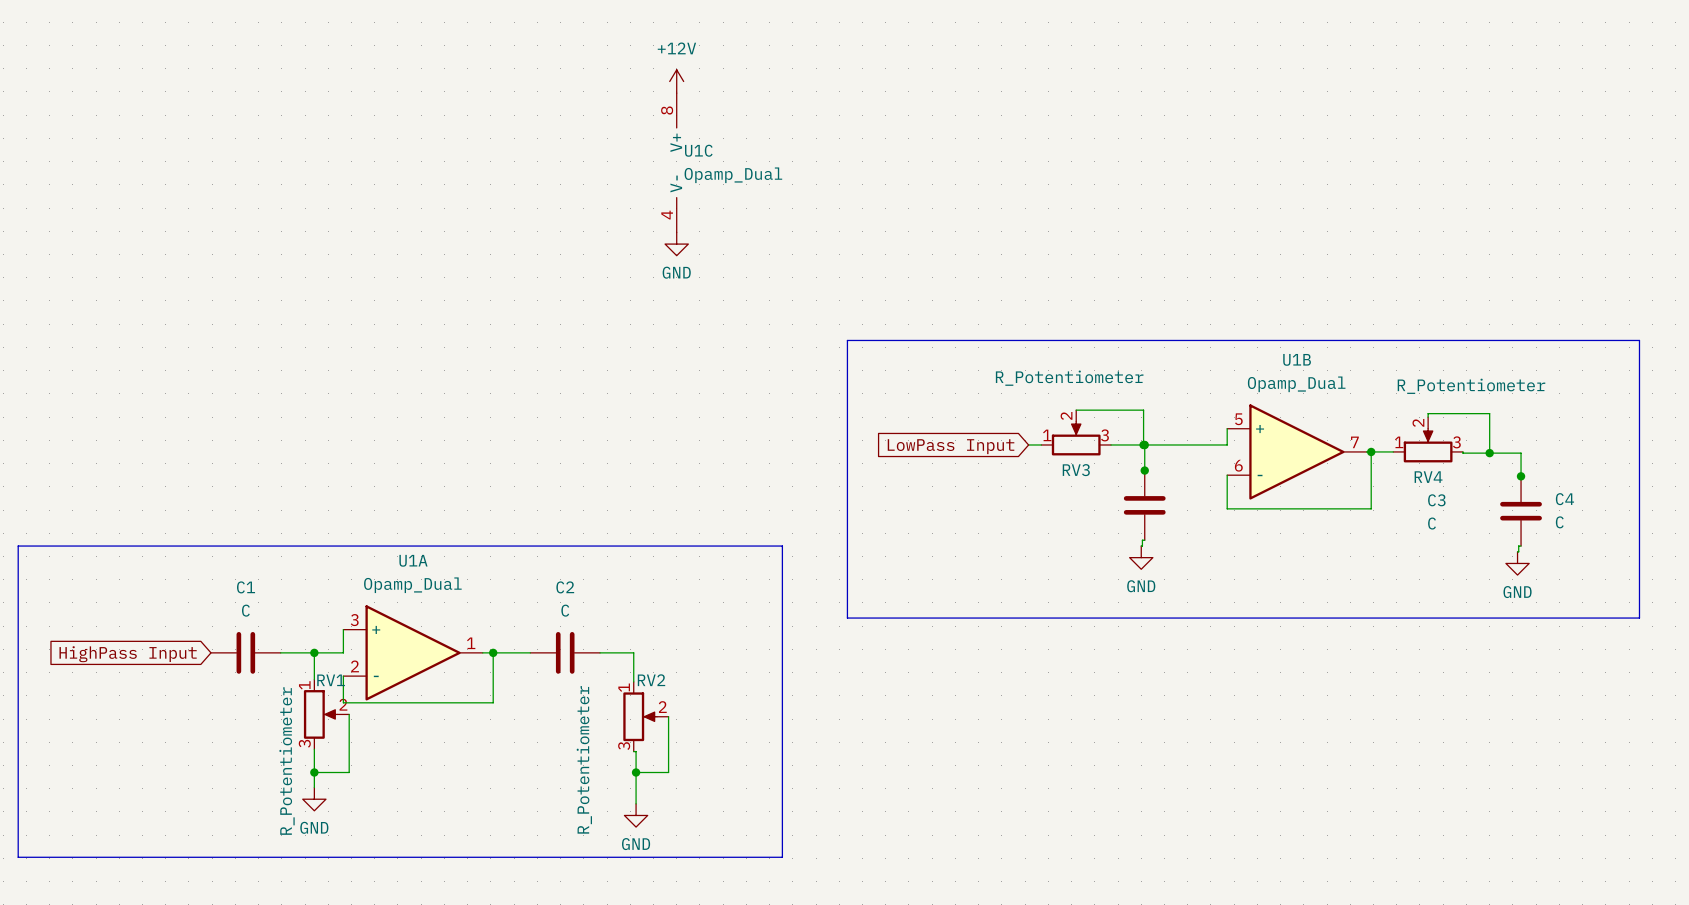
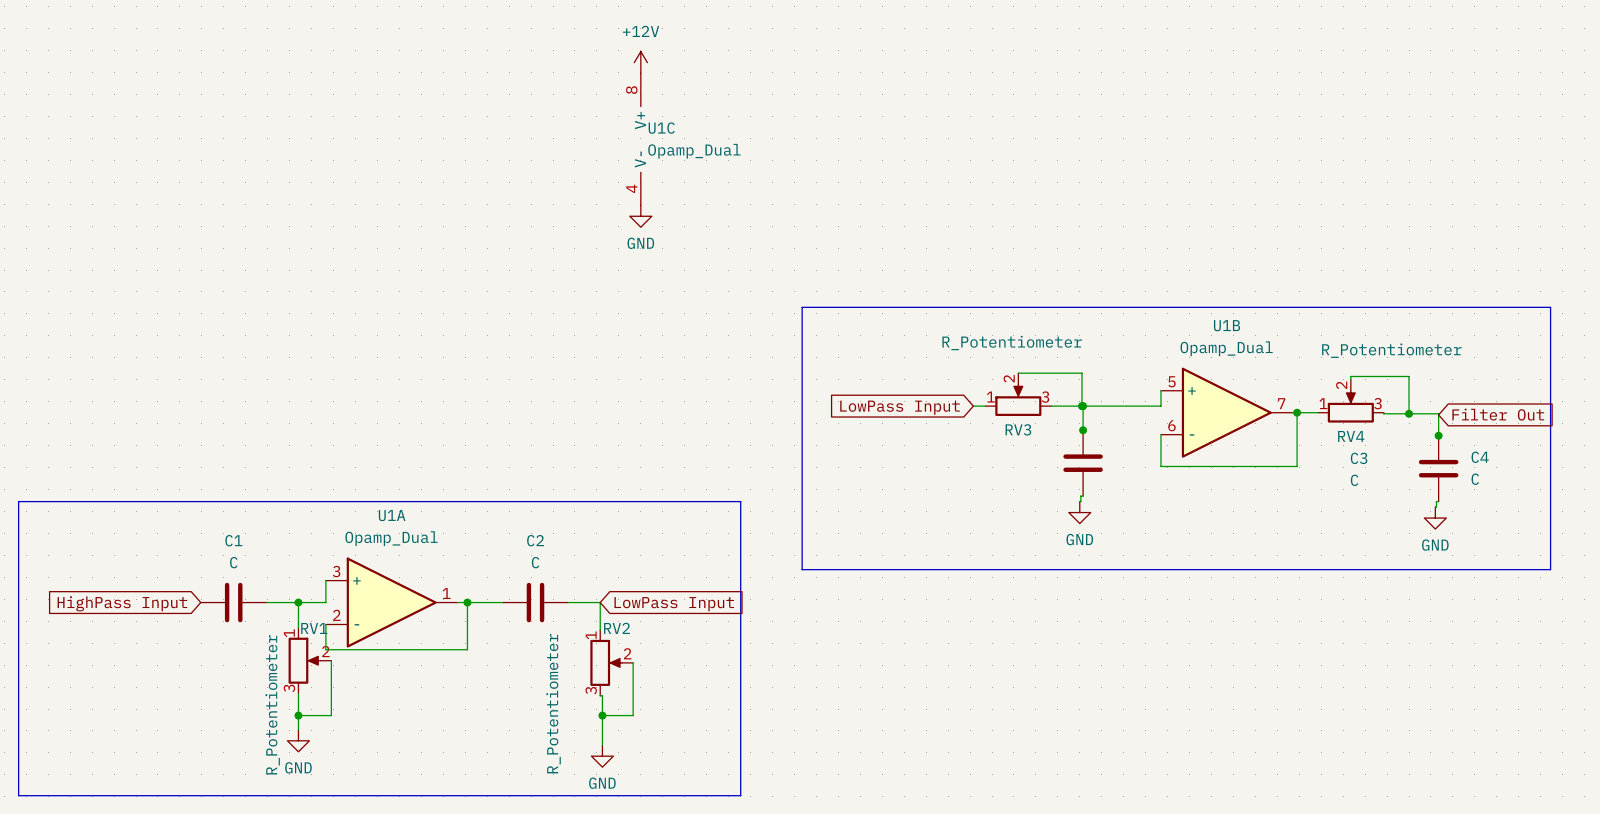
global label: none -> Filter Out (1498, 414)
global label: none -> LowPass Input (674, 604)

